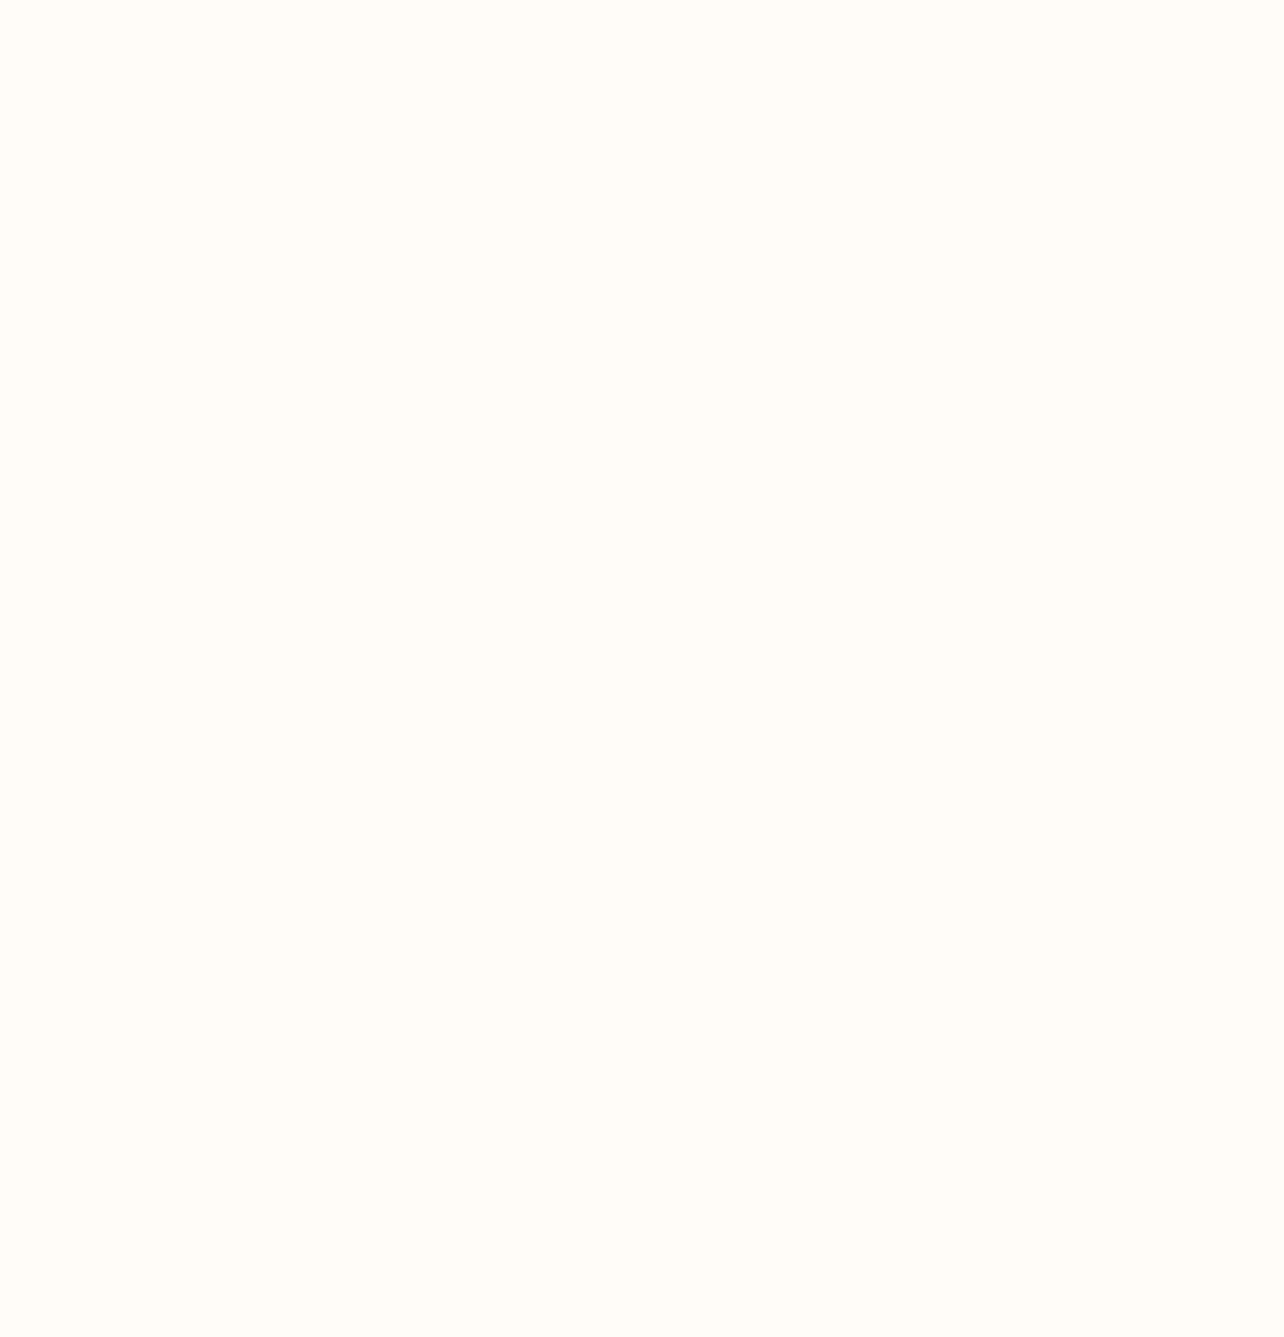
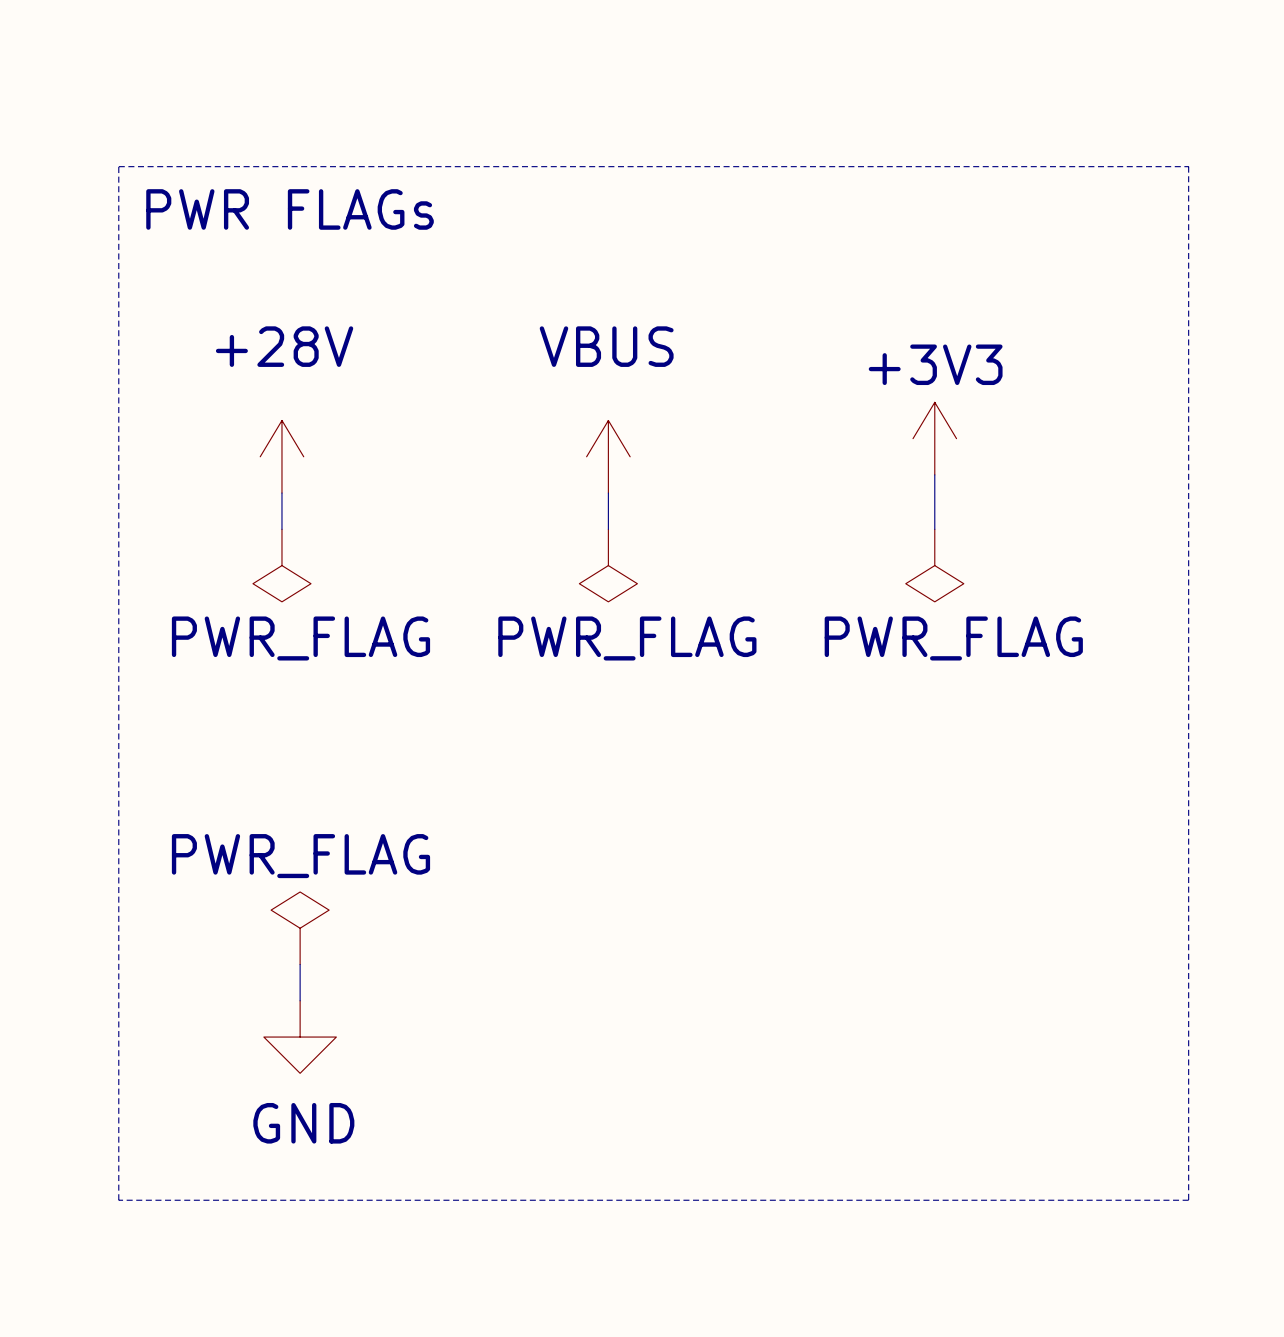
line: none -> (118, 166) (1188, 166) (1188, 1200) (118, 1200) (118, 166)
text: none -> PWR FLAGs (290, 209)
power symbol: none -> +3V3 (934, 438)
power symbol: none -> +28V (281, 456)
power symbol: none -> VBUS (608, 456)
wire: none -> (934, 474) (934, 529)
wire: none -> (281, 493) (281, 529)
wire: none -> (608, 493) (608, 529)
power symbol: none -> PWR_FLAG (281, 565)
power symbol: none -> PWR_FLAG (608, 565)
power symbol: none -> PWR_FLAG (934, 565)
power symbol: none -> PWR_FLAG (300, 928)
wire: none -> (300, 964) (300, 1000)
power symbol: none -> GND (300, 1037)

